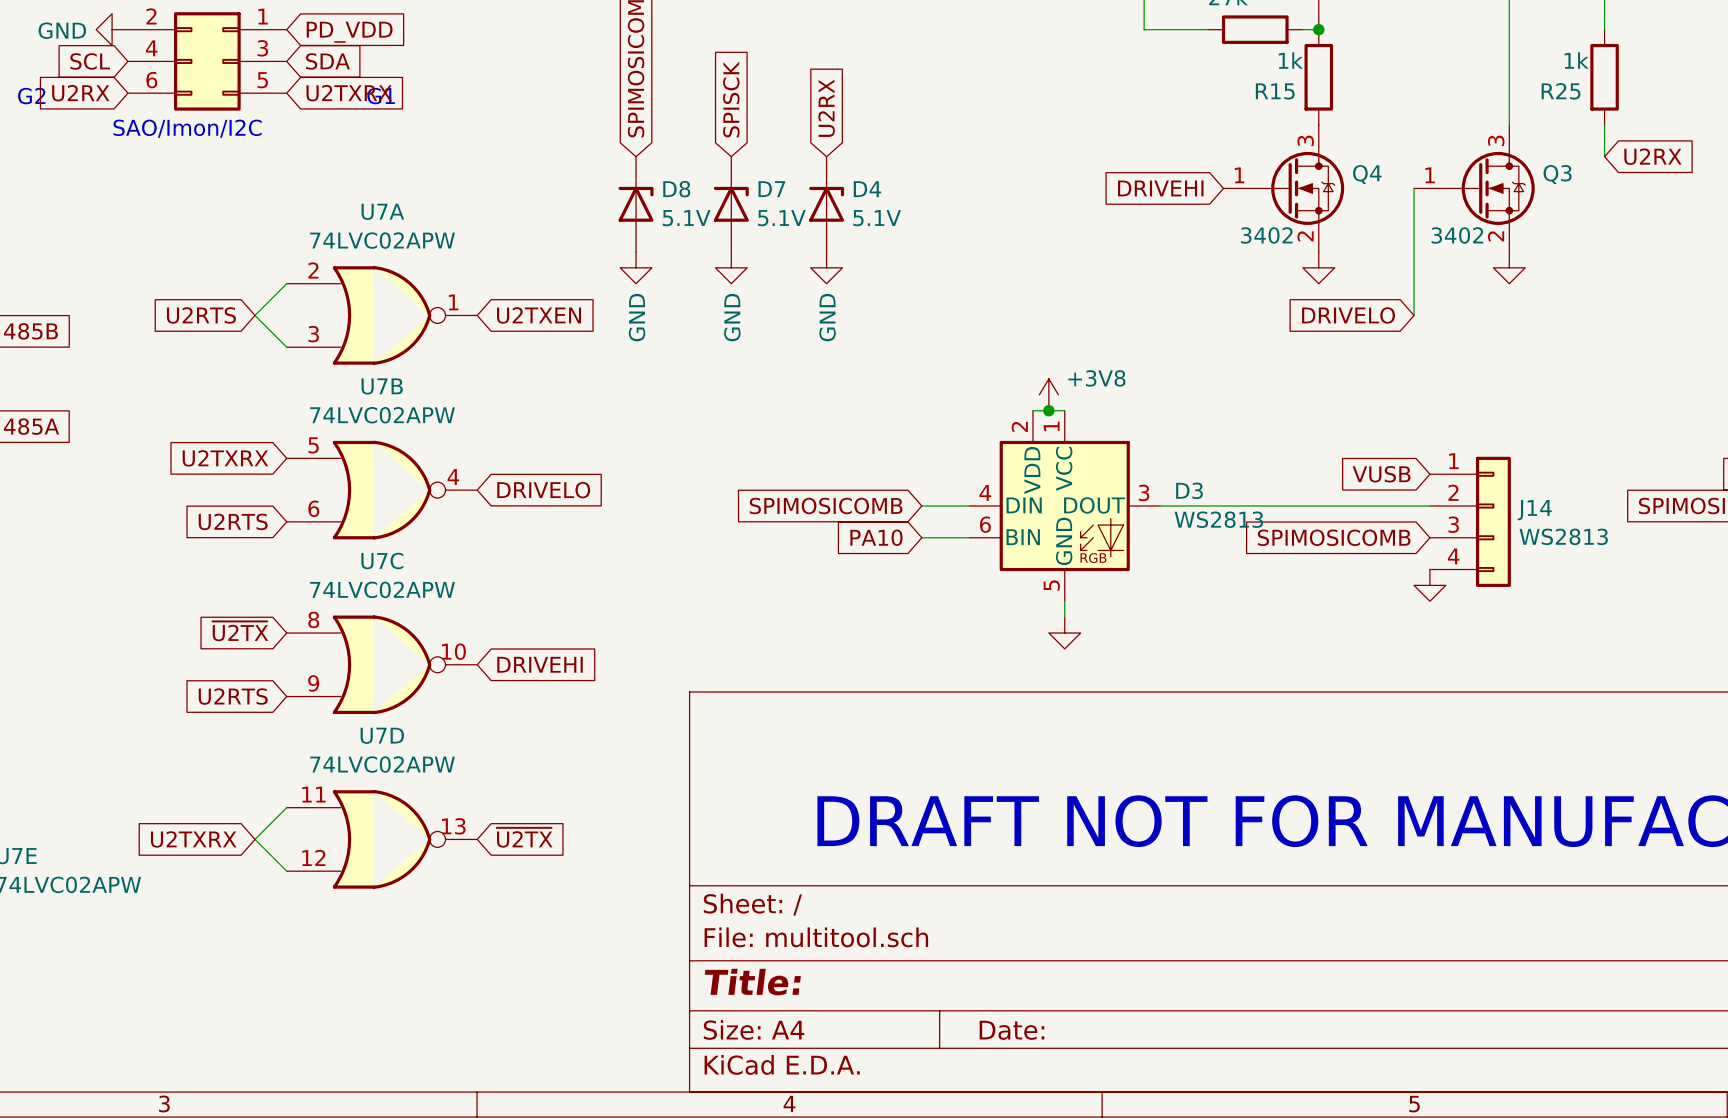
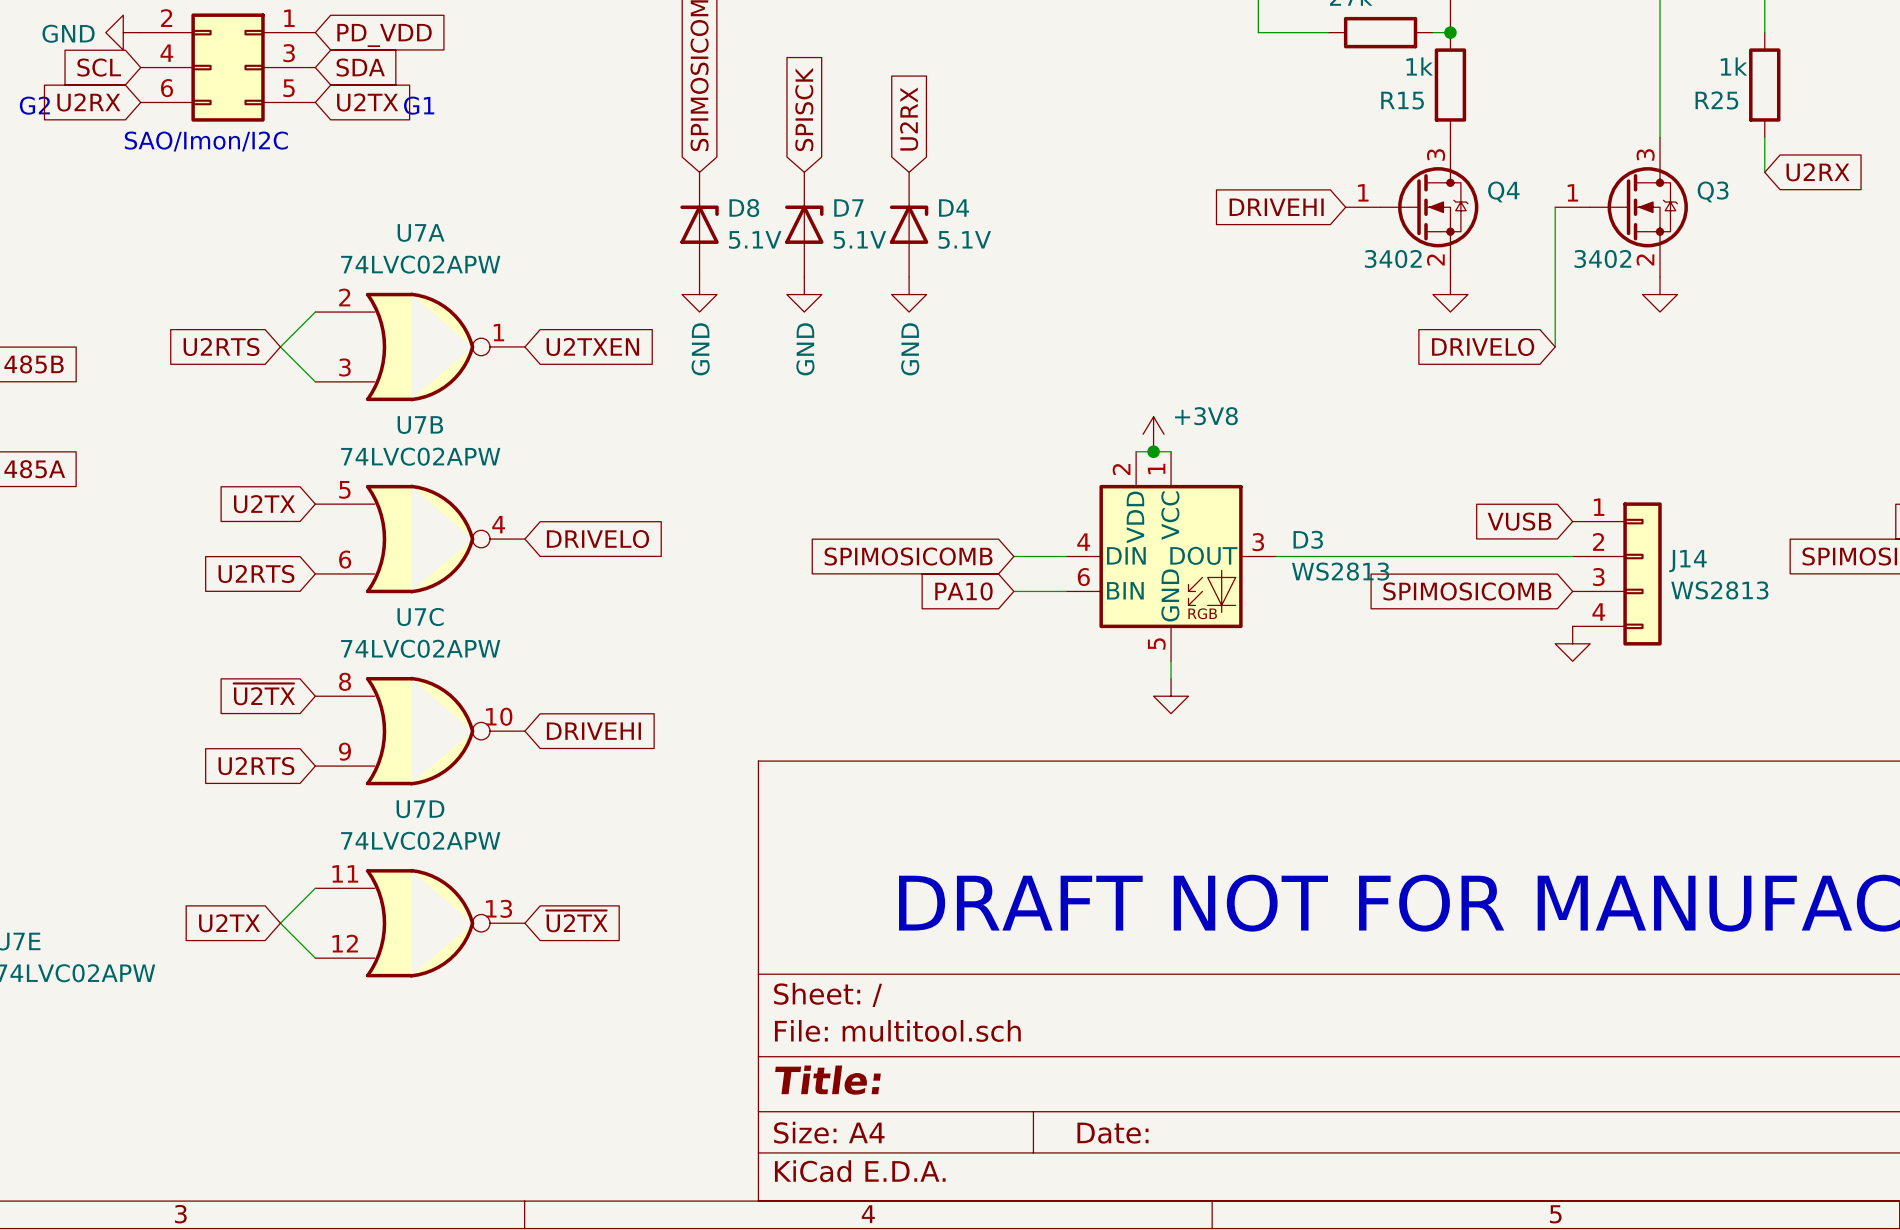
global label: U2TXRX (349, 93) -> U2TX (367, 102)
global label: U2TXRX (225, 458) -> U2TX (264, 504)
global label: U2TXRX (193, 839) -> U2TX (229, 923)

